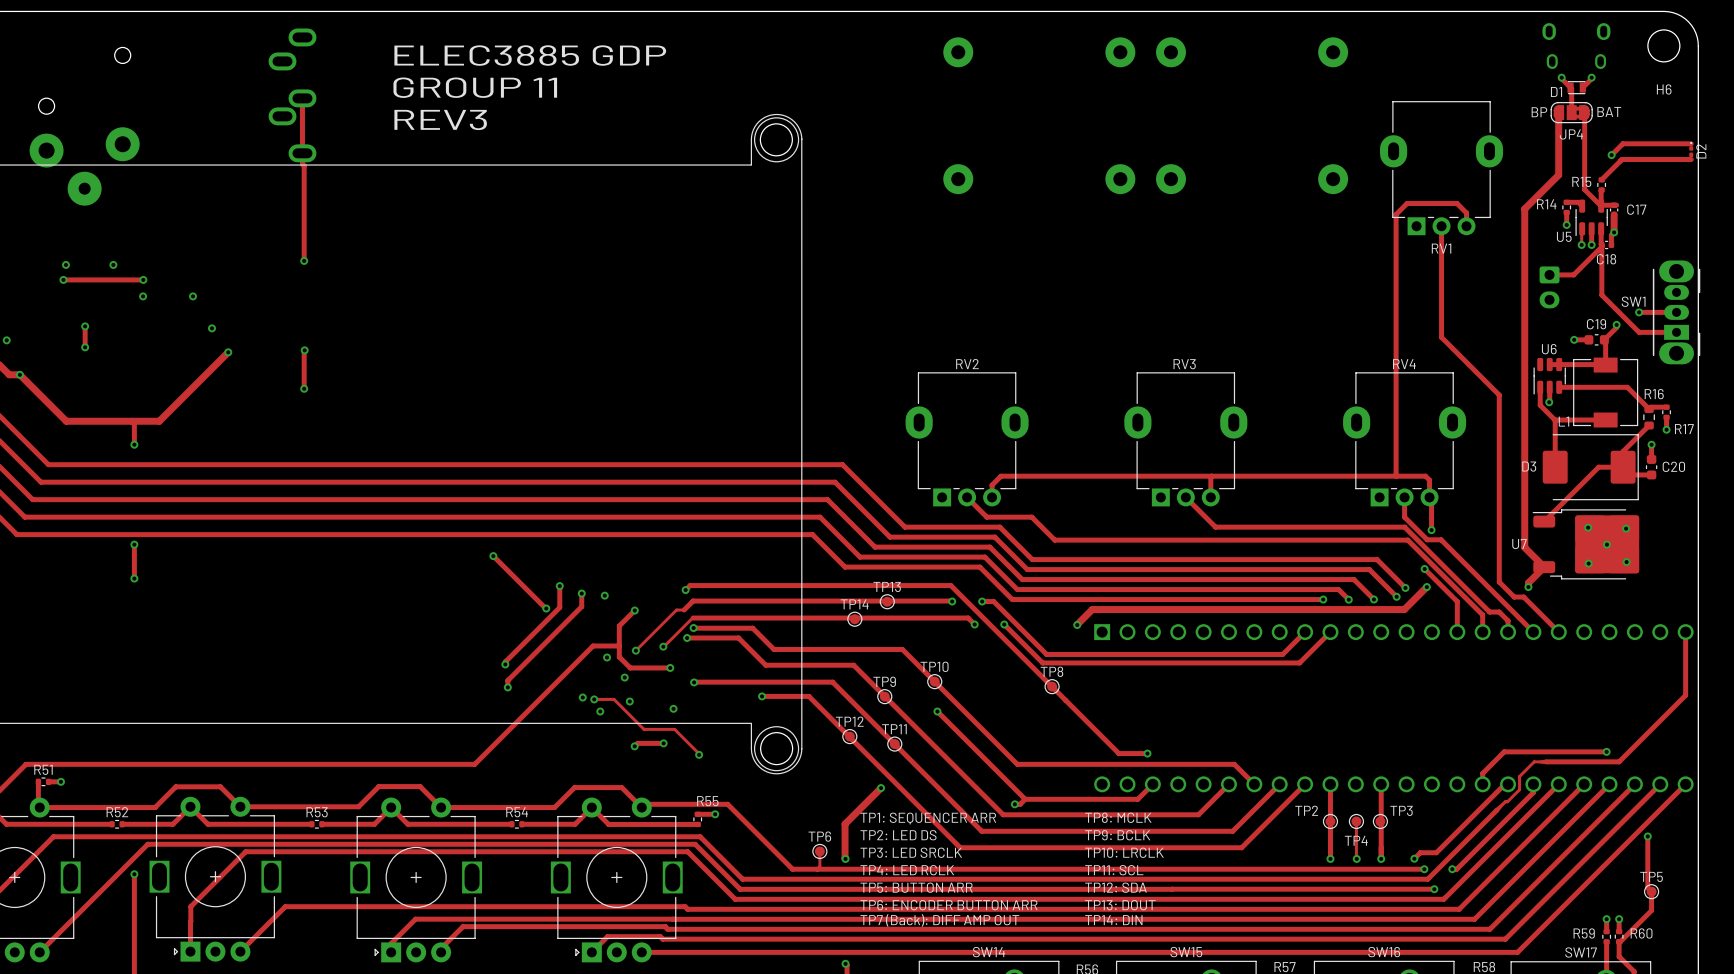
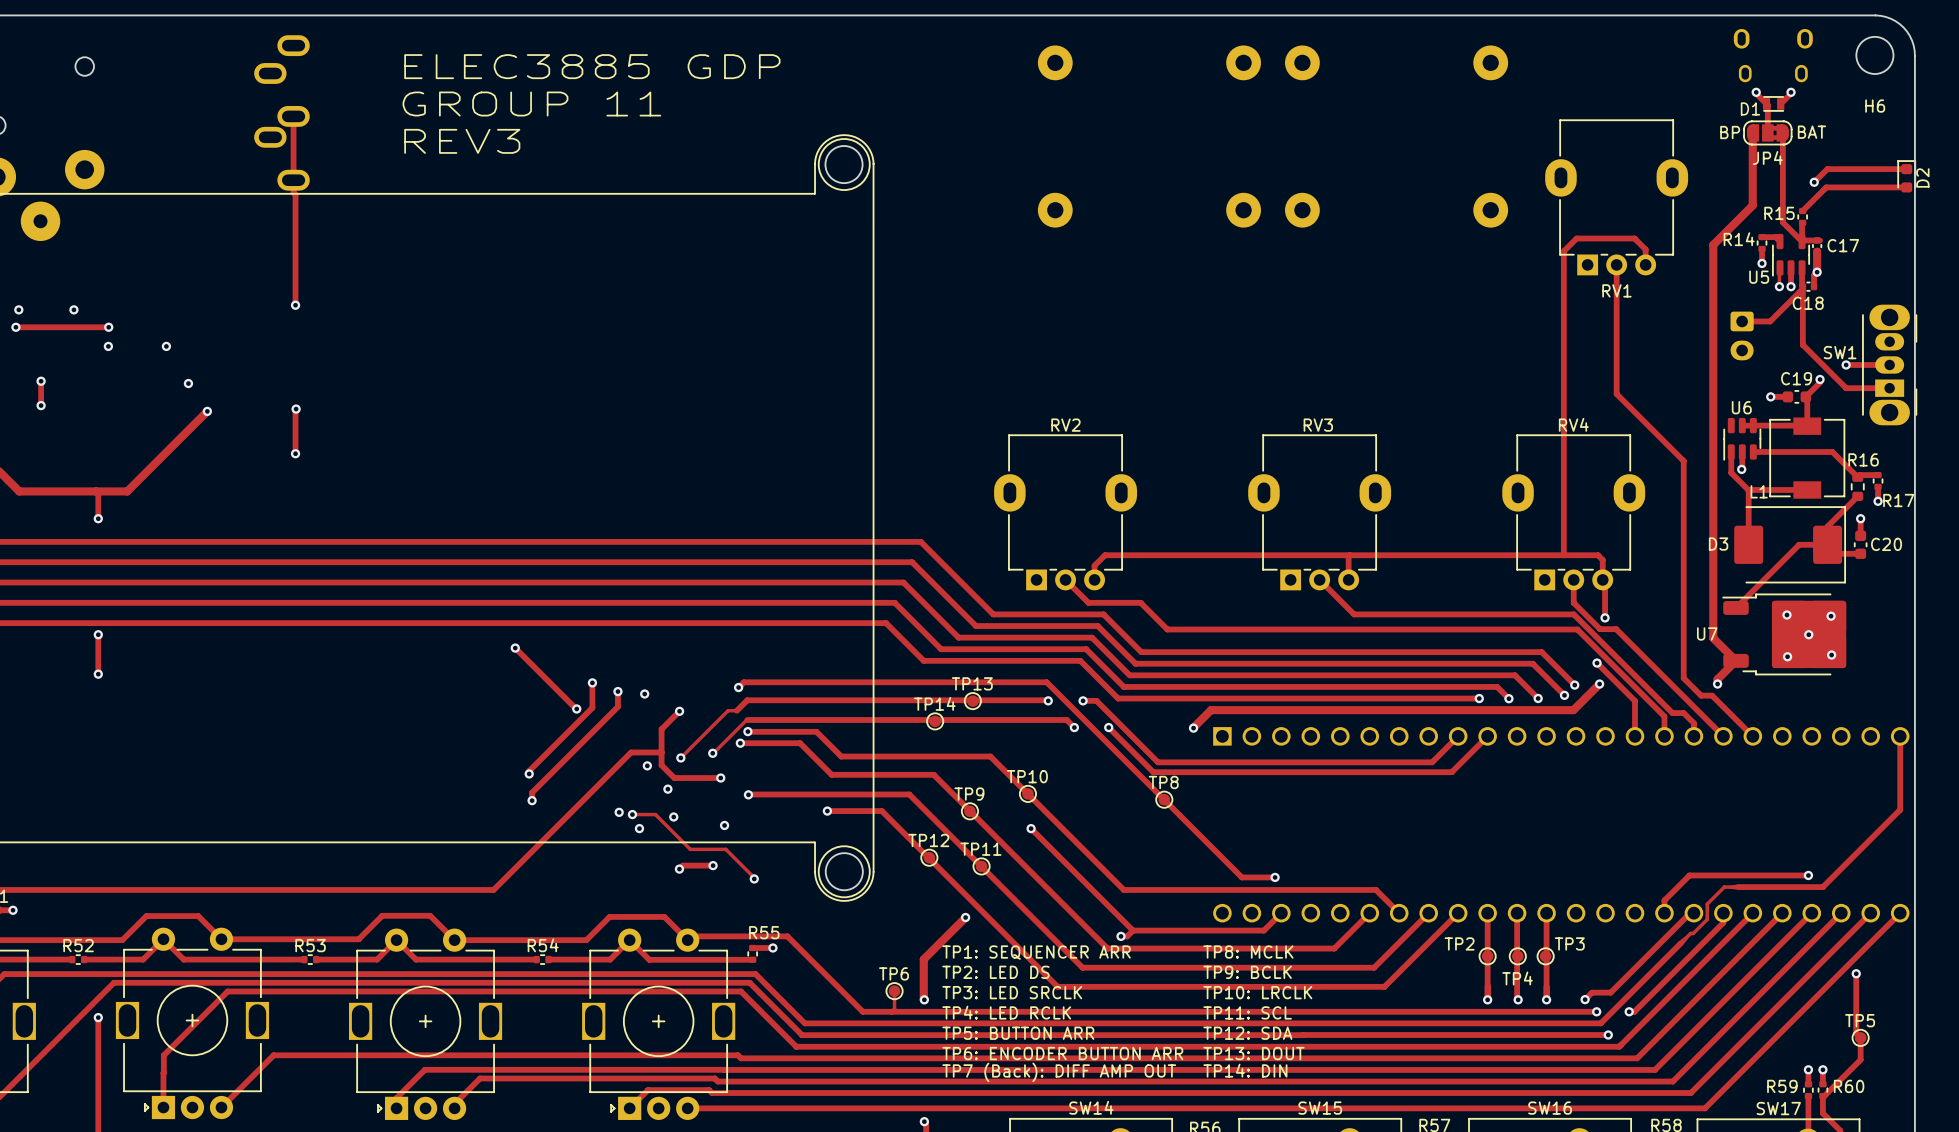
D2 footprint: [1689, 142, 1694, 158] -> [1897, 160, 1916, 193]
track: none -> (1517, 913) (1517, 999)

